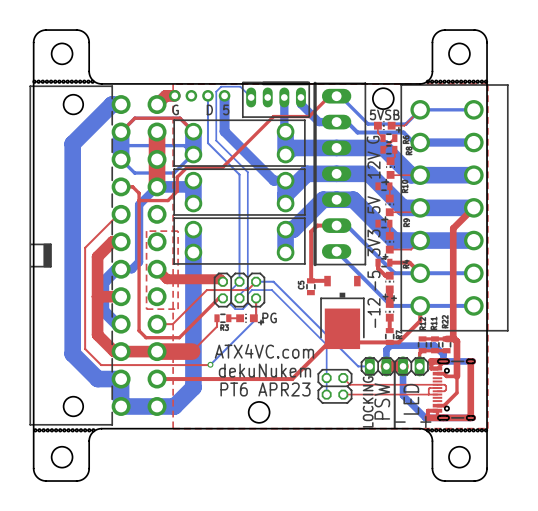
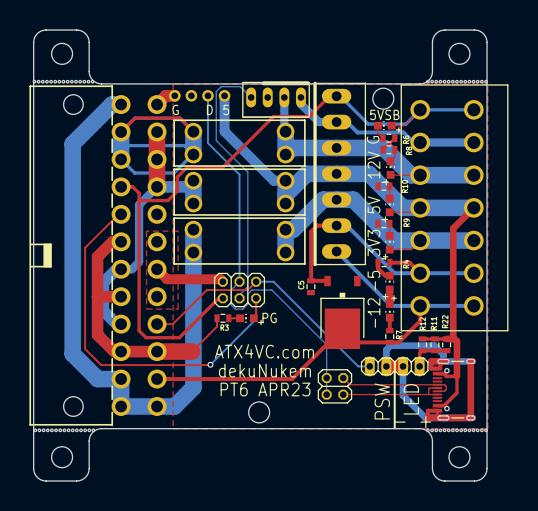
text: LOCKING (368, 401) -> none

